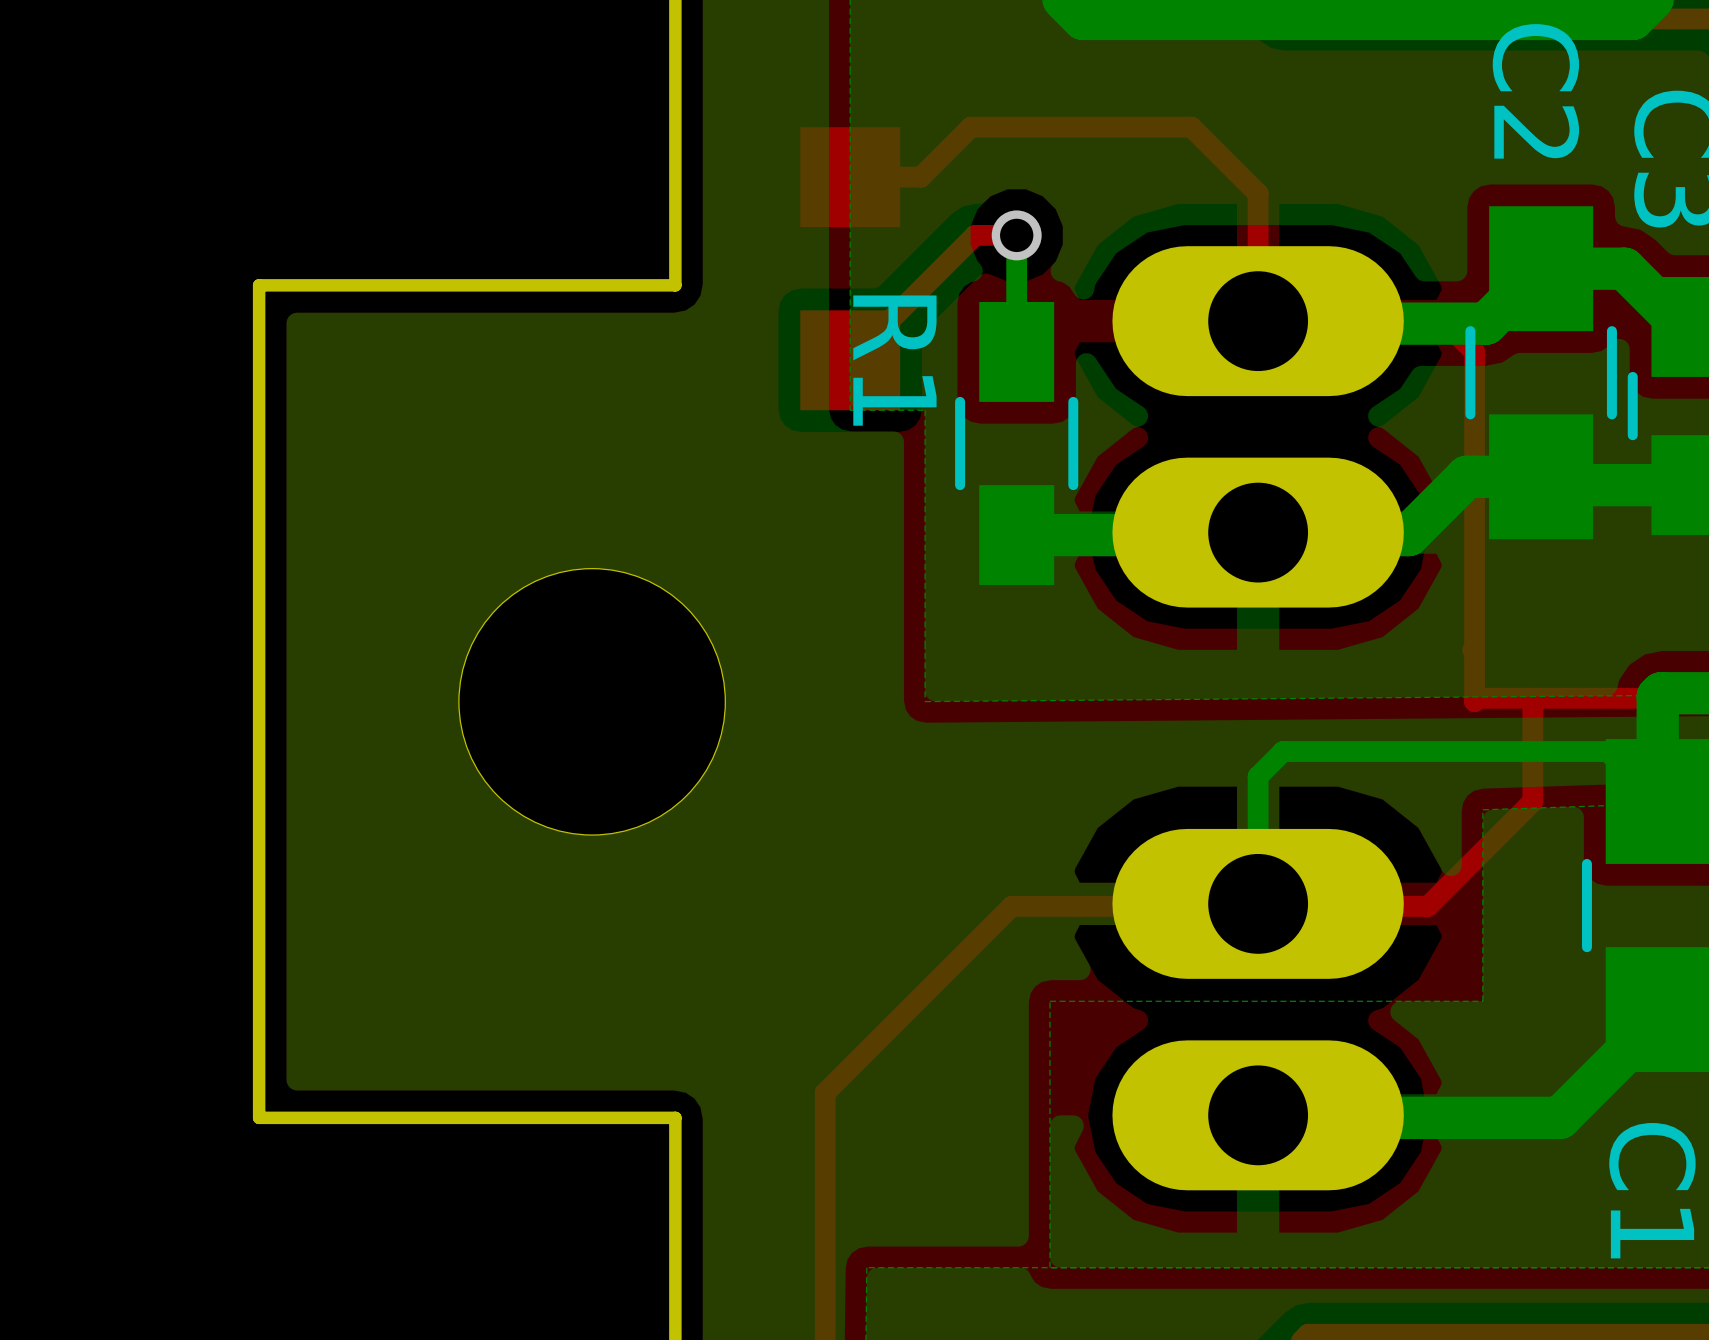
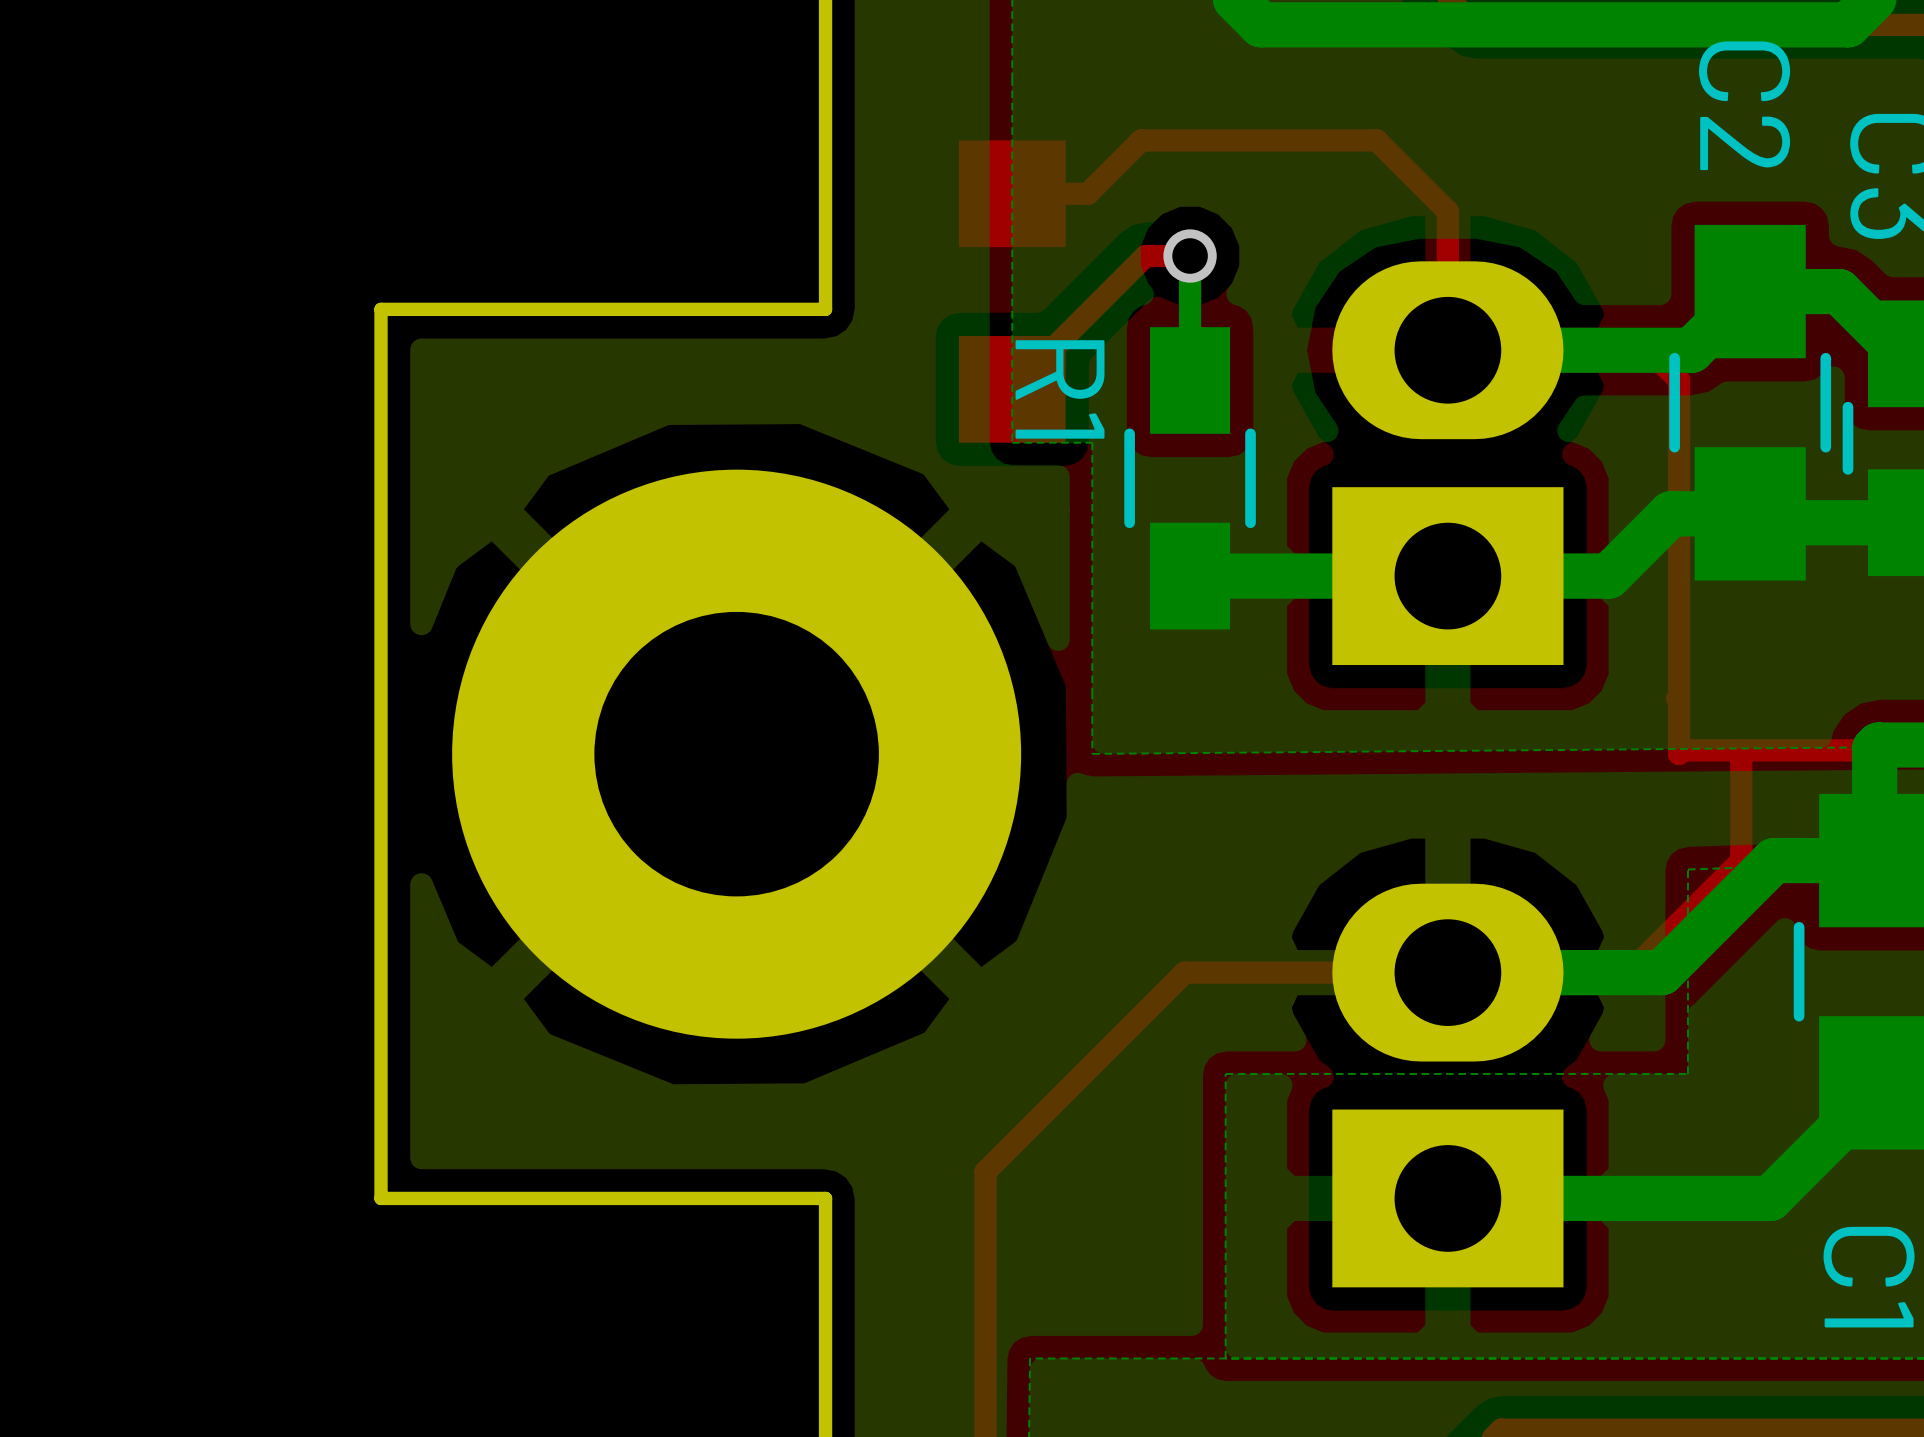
part footprint: [1112, 246, 1404, 608] -> [1332, 261, 1564, 665]
part footprint: [458, 568, 726, 836] -> [452, 469, 1022, 1039]
bottom track: (1657, 801) (1607, 751) (1283, 751) (1258, 776) (1258, 903) -> (1874, 860) (1773, 860) (1661, 972) (1447, 972)
part footprint: [1112, 828, 1404, 1191] -> [1332, 883, 1564, 1288]

